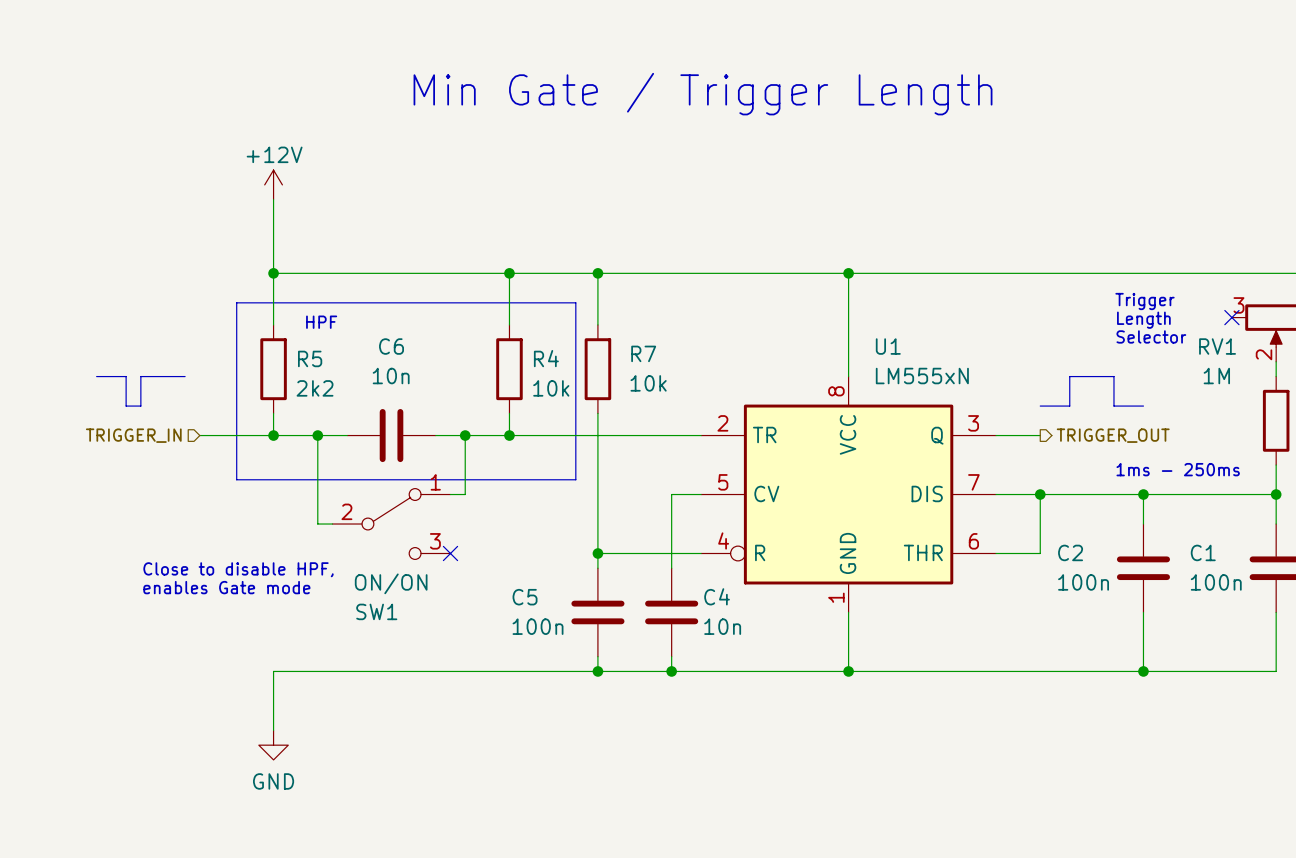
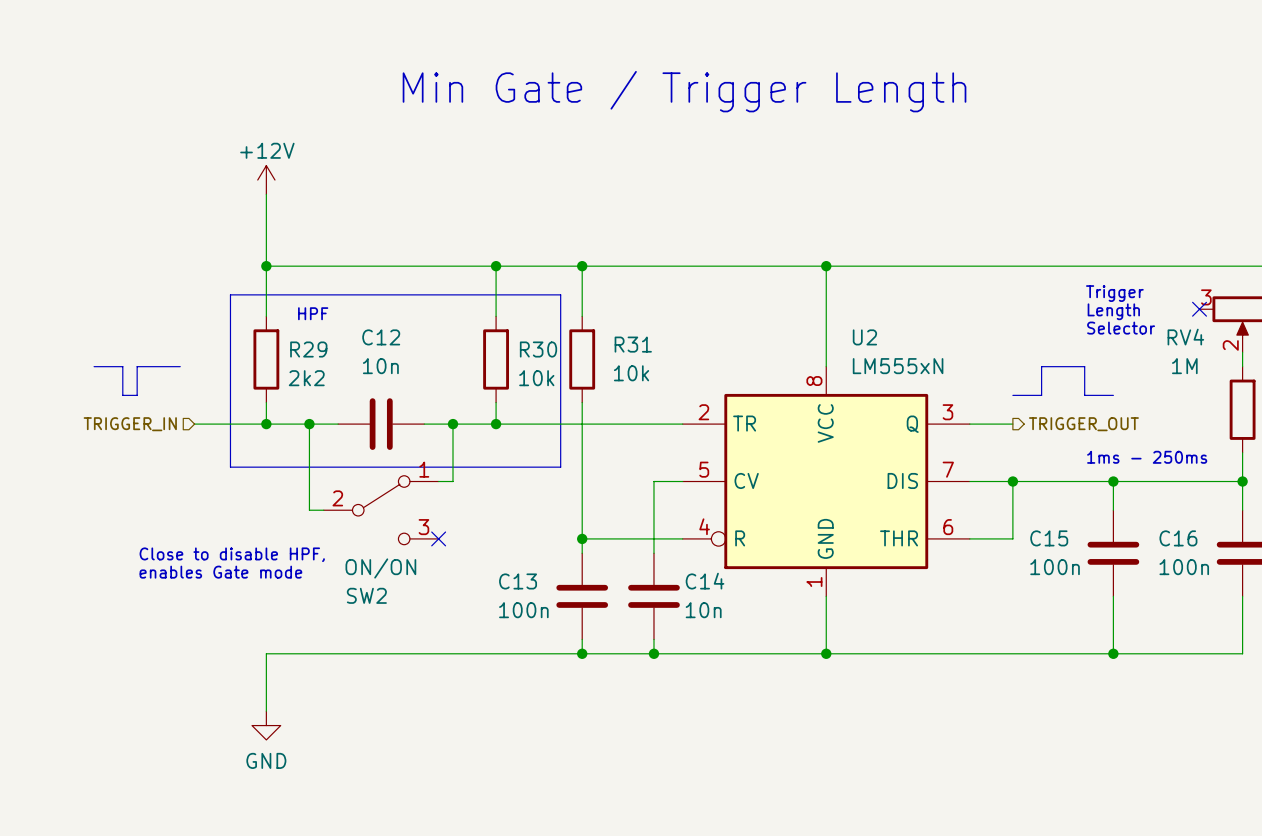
C6 name: C6 (391, 346) -> C12 (381, 337)
U1 name: U1 (888, 346) -> U2 (864, 337)
RV1 name: RV1 (1217, 346) -> RV4 (1185, 337)
R7 name: R7 (643, 353) -> R31 (633, 344)
R5 name: R5 (310, 358) -> R29 (308, 349)
R4 name: R4 (546, 358) -> R30 (538, 349)
C2 name: C2 (1070, 552) -> C15 (1049, 538)
C1 name: C1 (1203, 552) -> C16 (1178, 538)
C4 name: C4 (717, 596) -> C14 (705, 581)
C5 name: C5 (525, 597) -> C13 (518, 581)
SW1 name: SW1 (376, 611) -> SW2 (366, 595)

